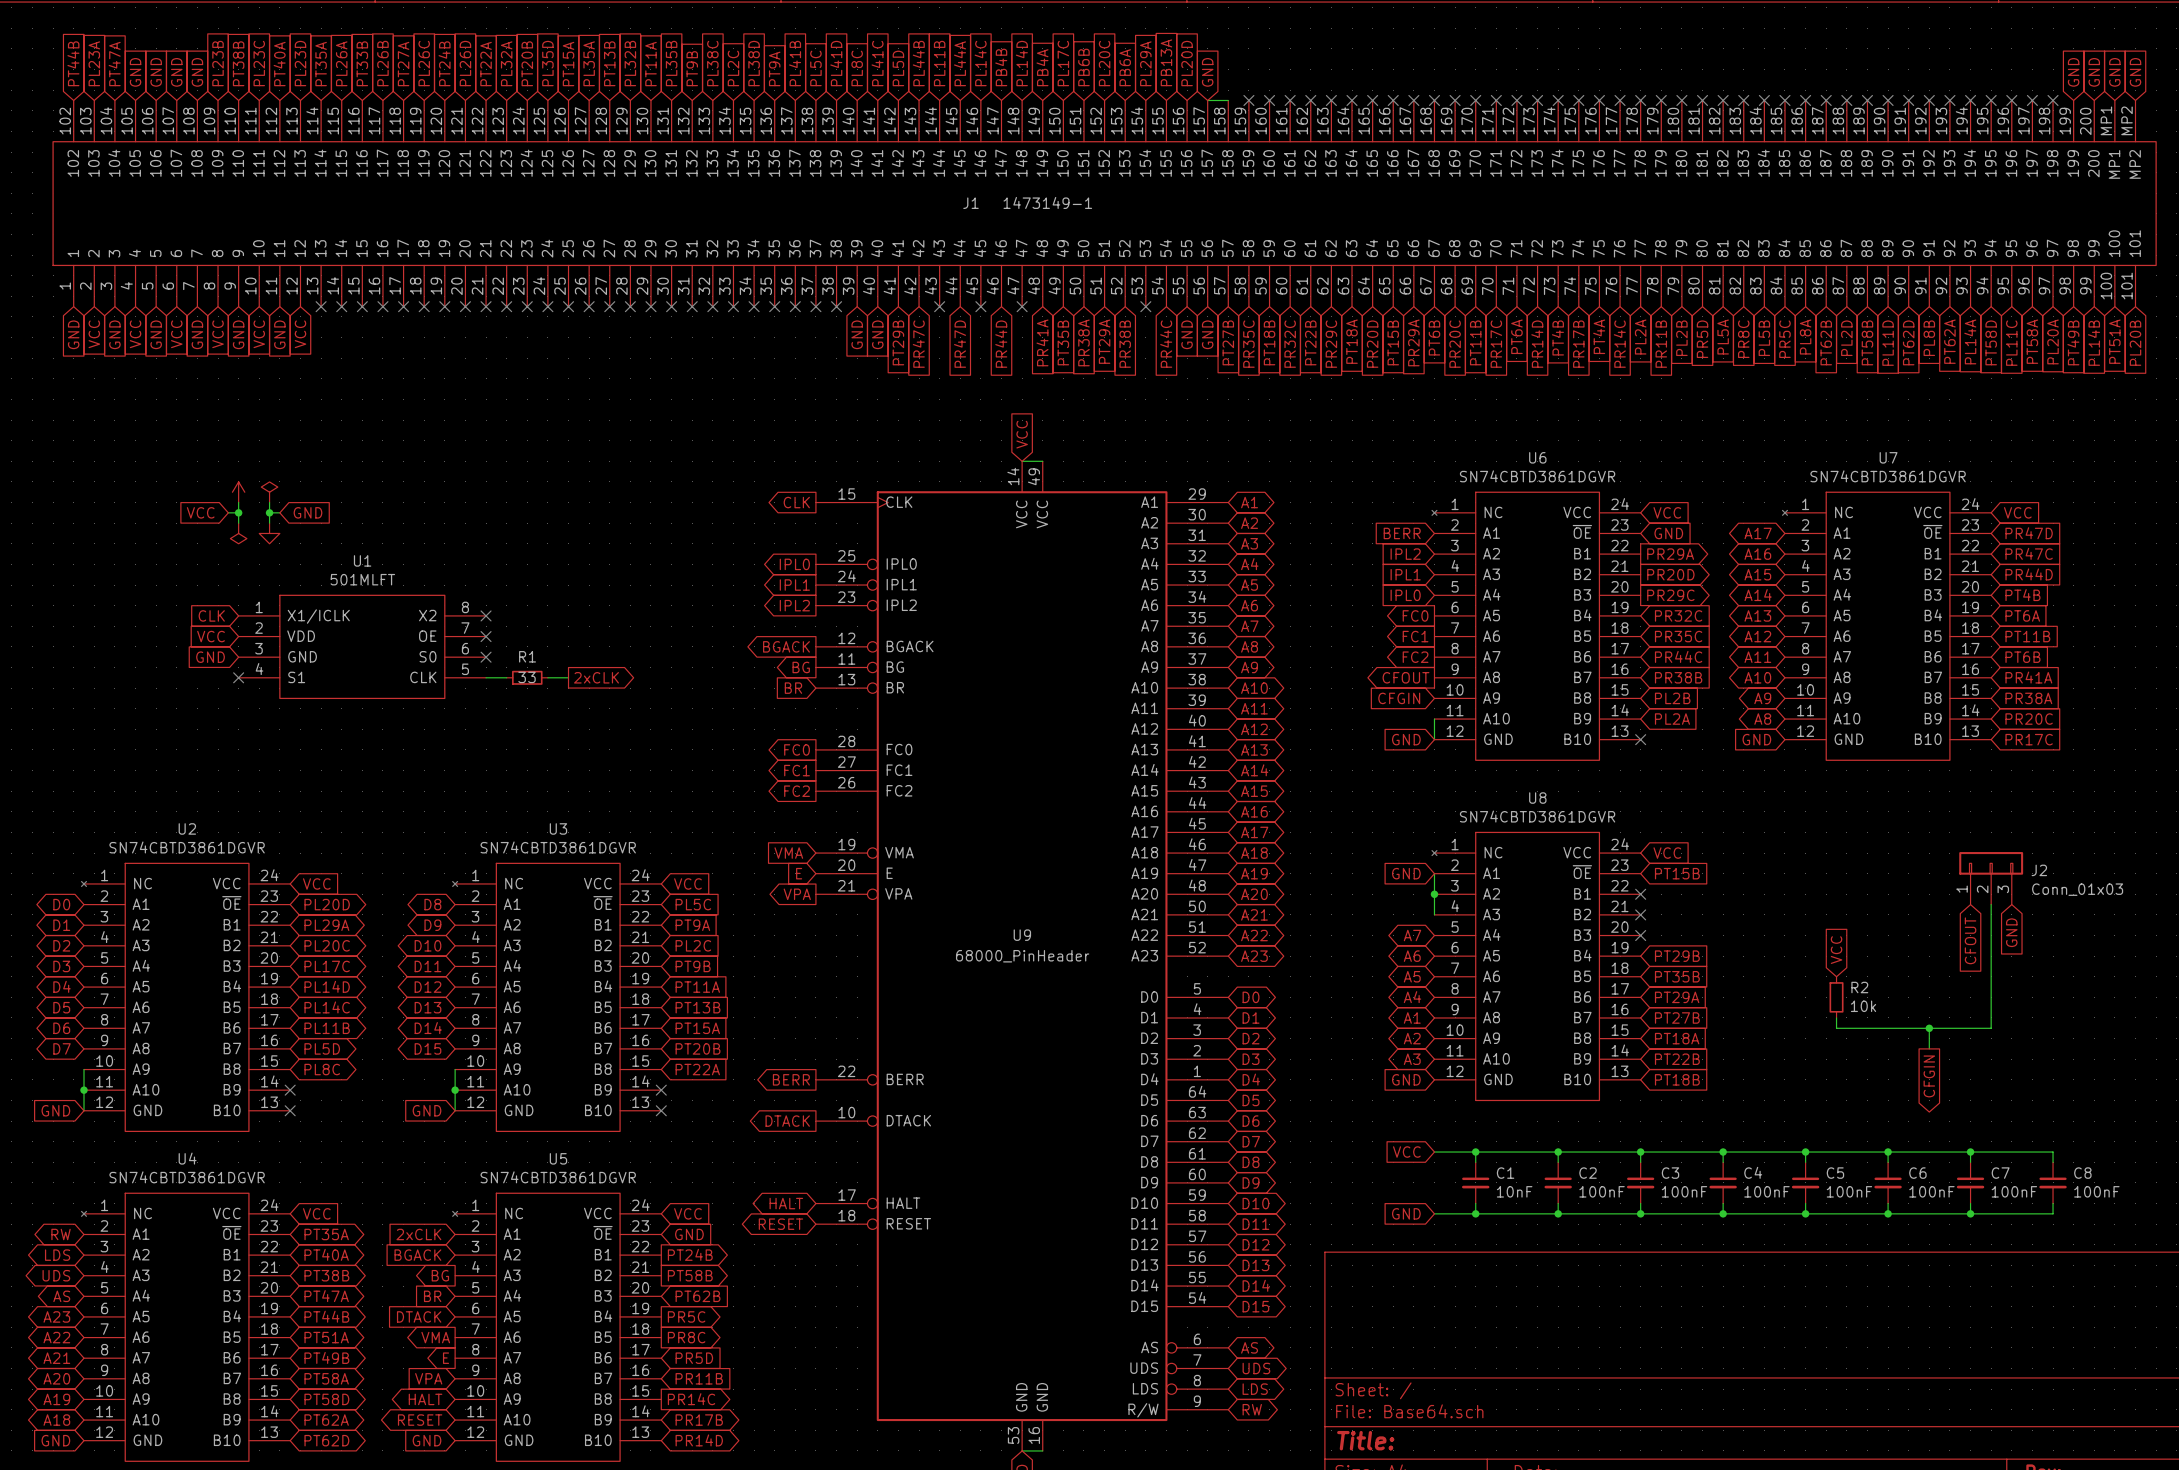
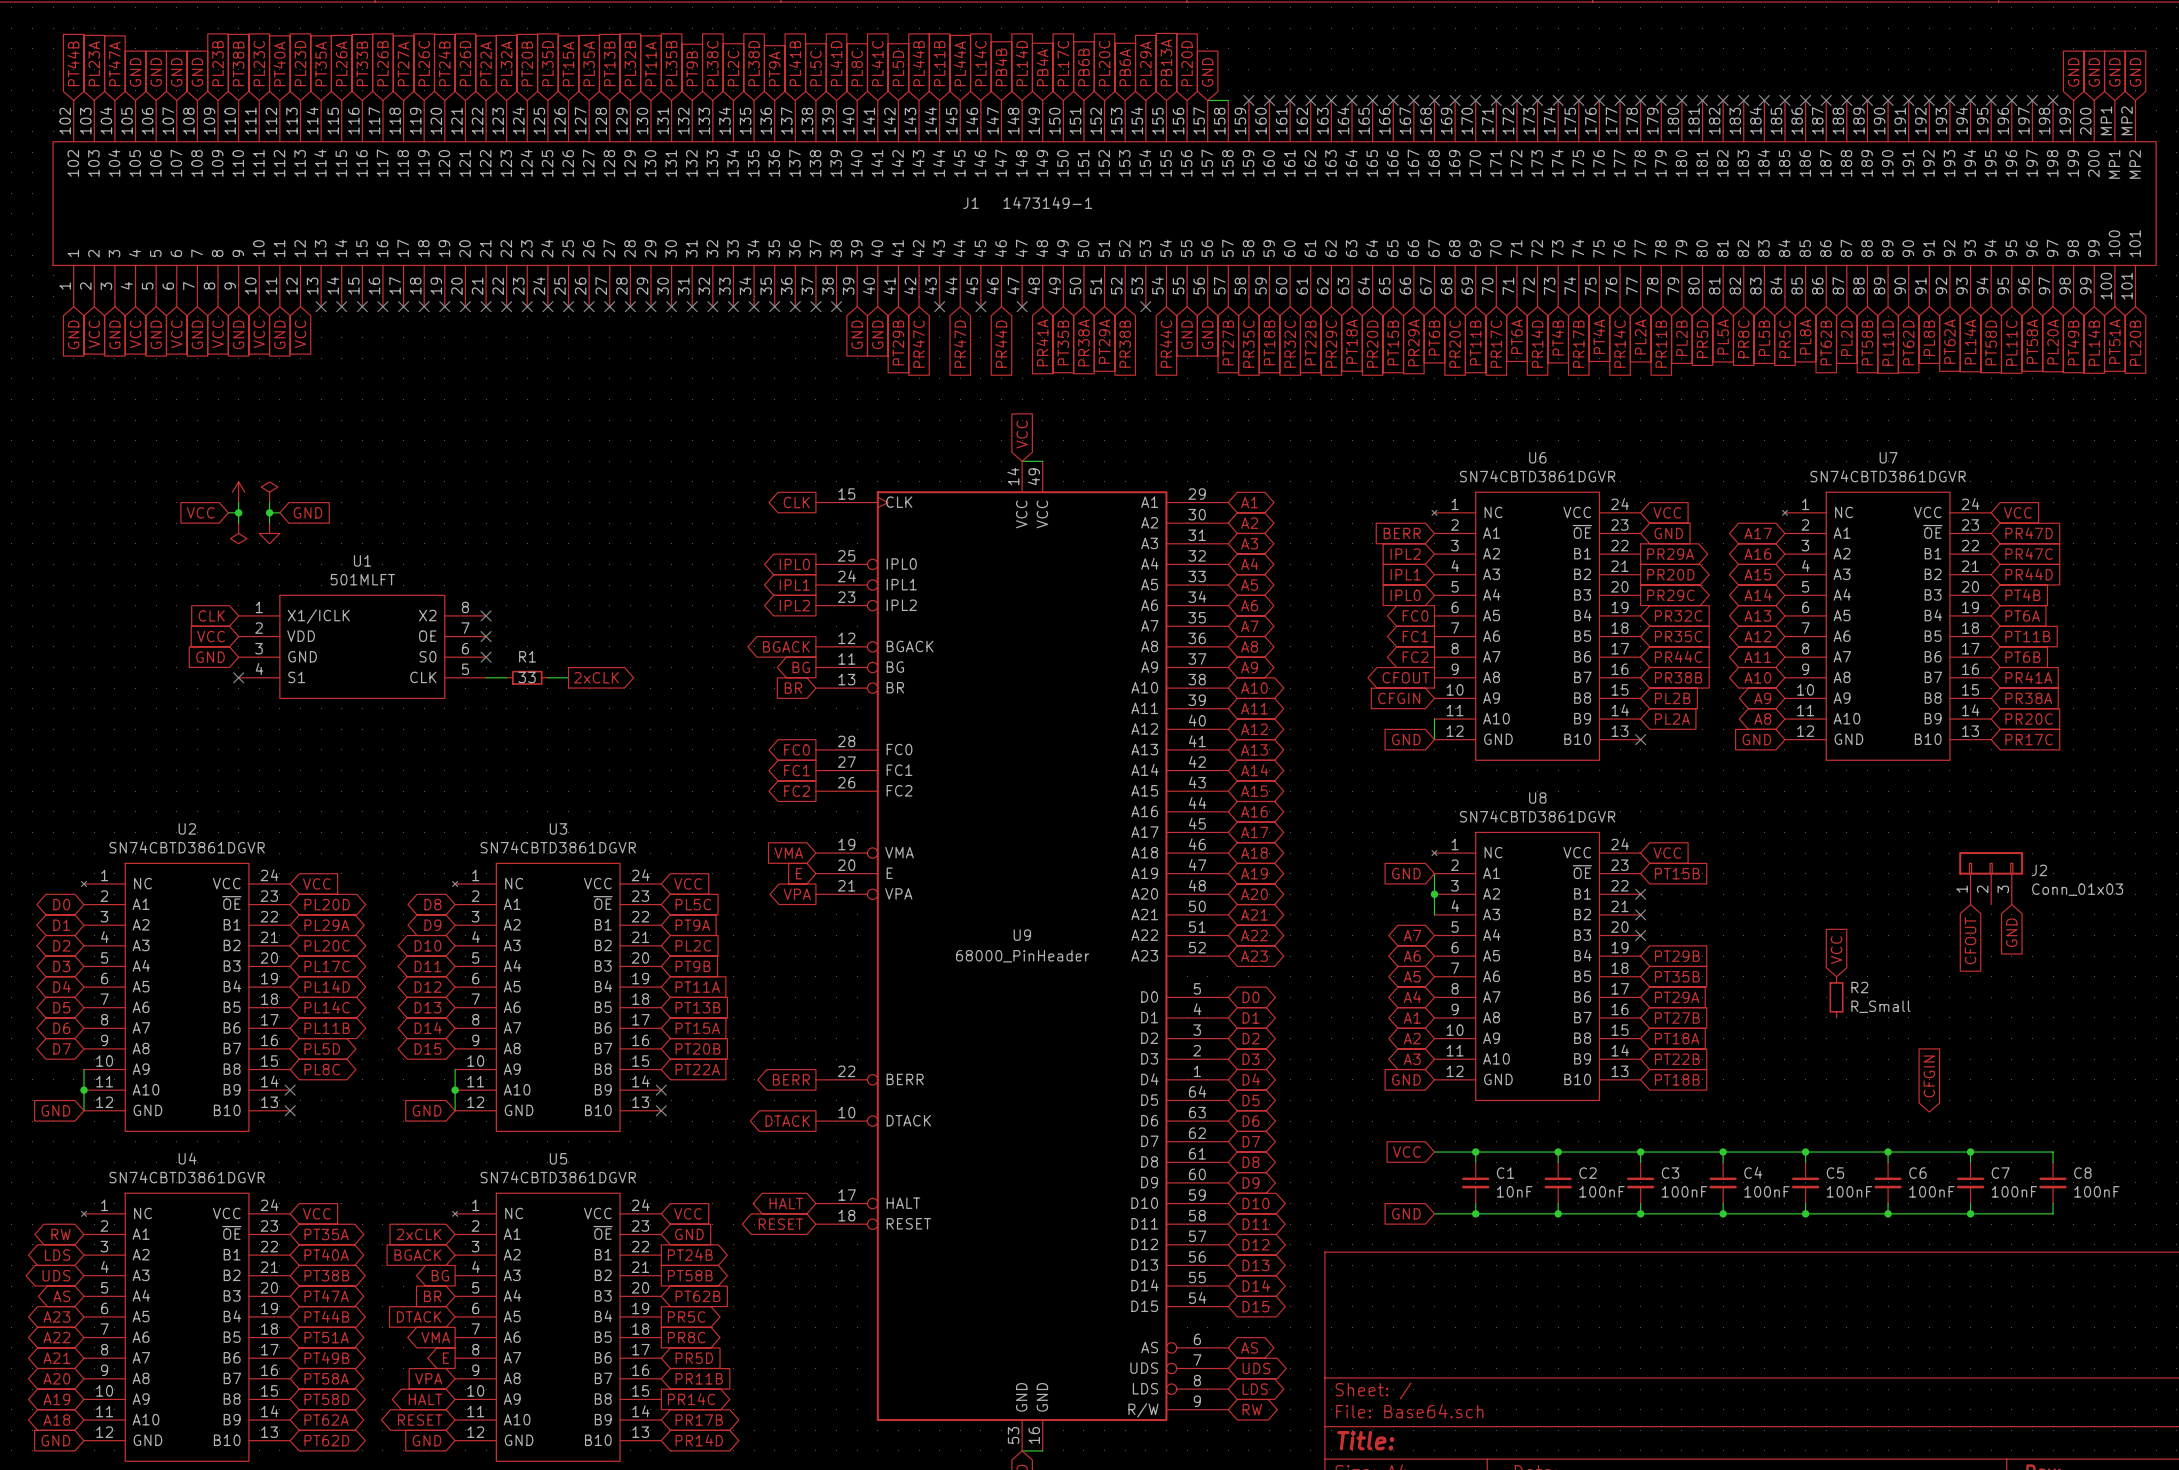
wire: (1991, 904) (1991, 1028) (1836, 1028) (1836, 1017) -> none
R2 value: 10k (1863, 1006) -> R_Small (1880, 1006)
wire: (1929, 1028) (1929, 1048) -> none
junction: (1929, 1028) -> none

